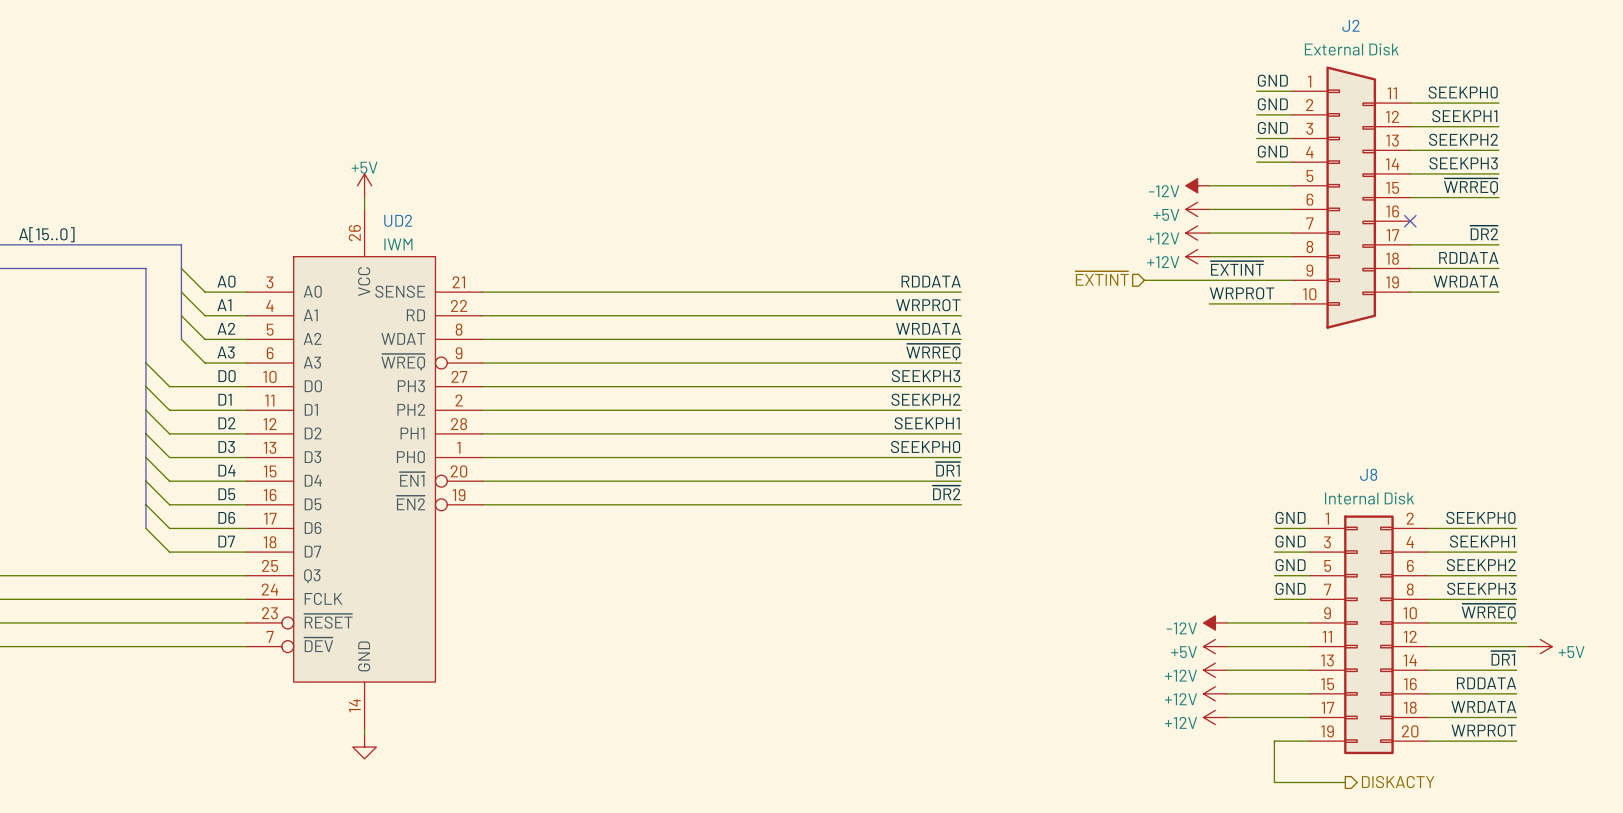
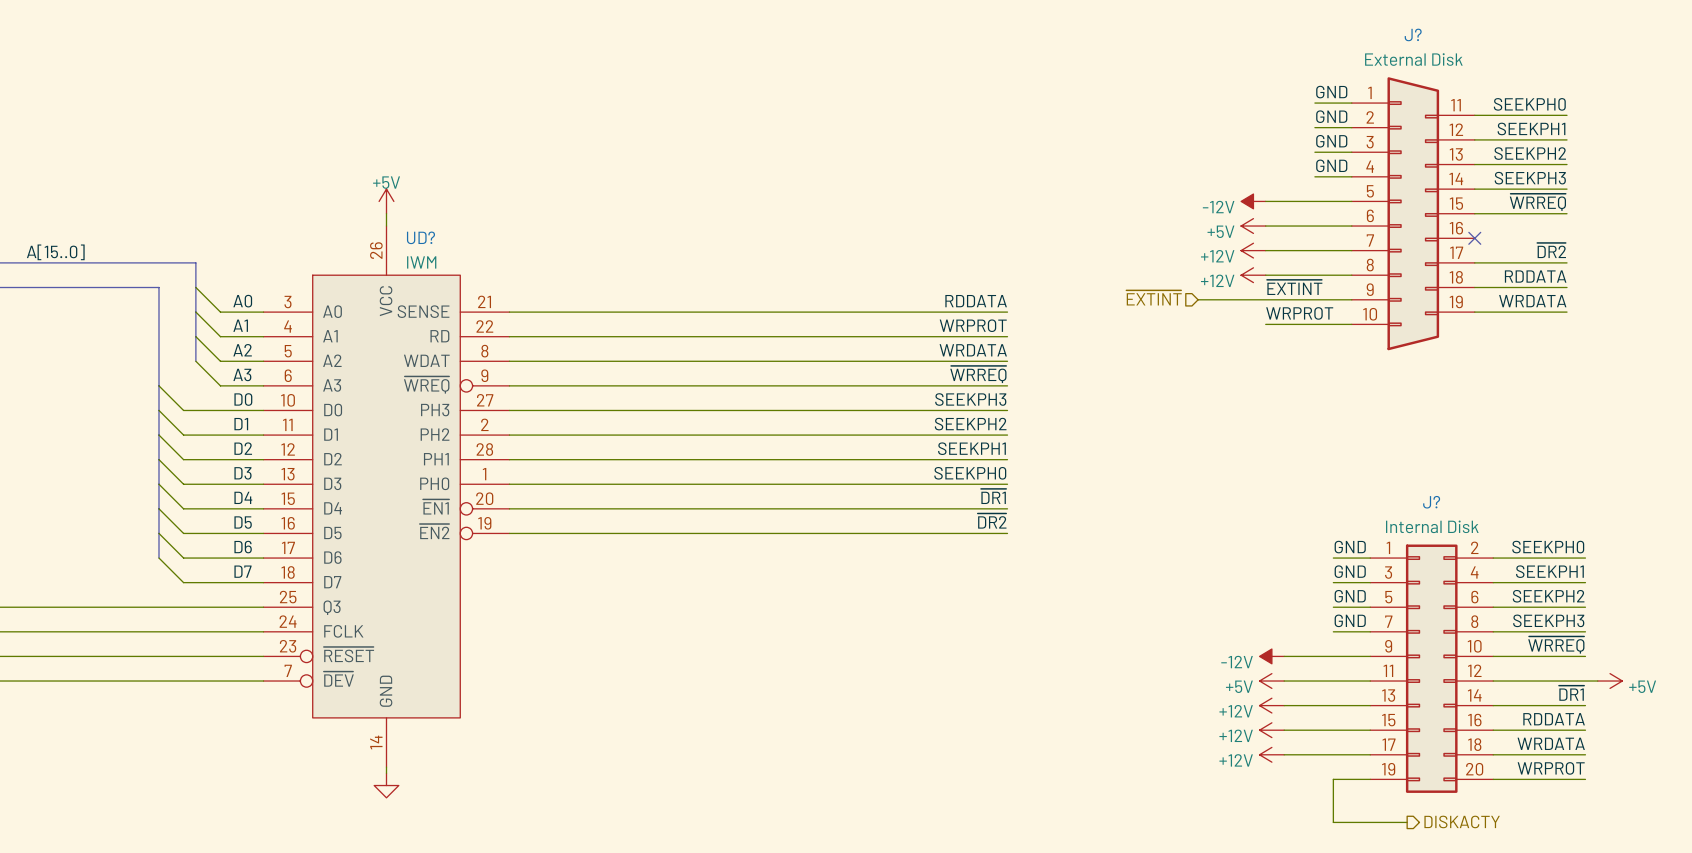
J2 name: J2 (1350, 25) -> J? (1413, 34)
UD2 name: UD2 (398, 220) -> UD? (420, 237)
J8 name: J8 (1368, 474) -> J? (1431, 502)

